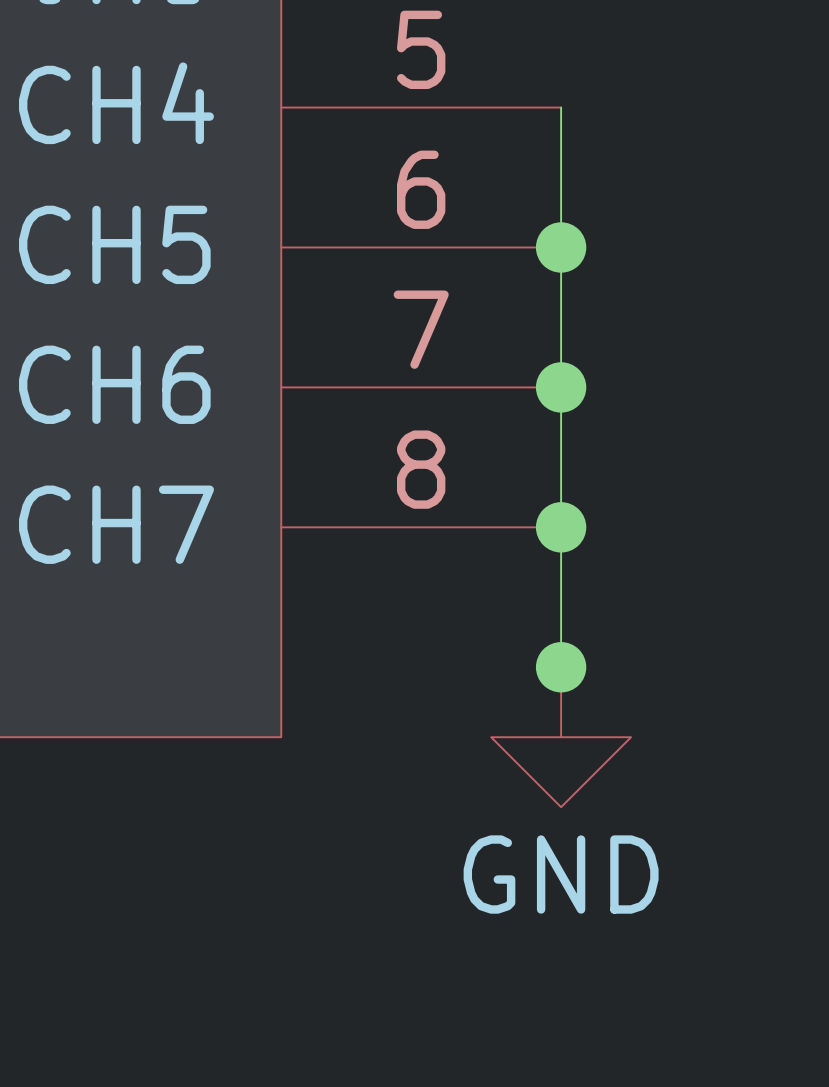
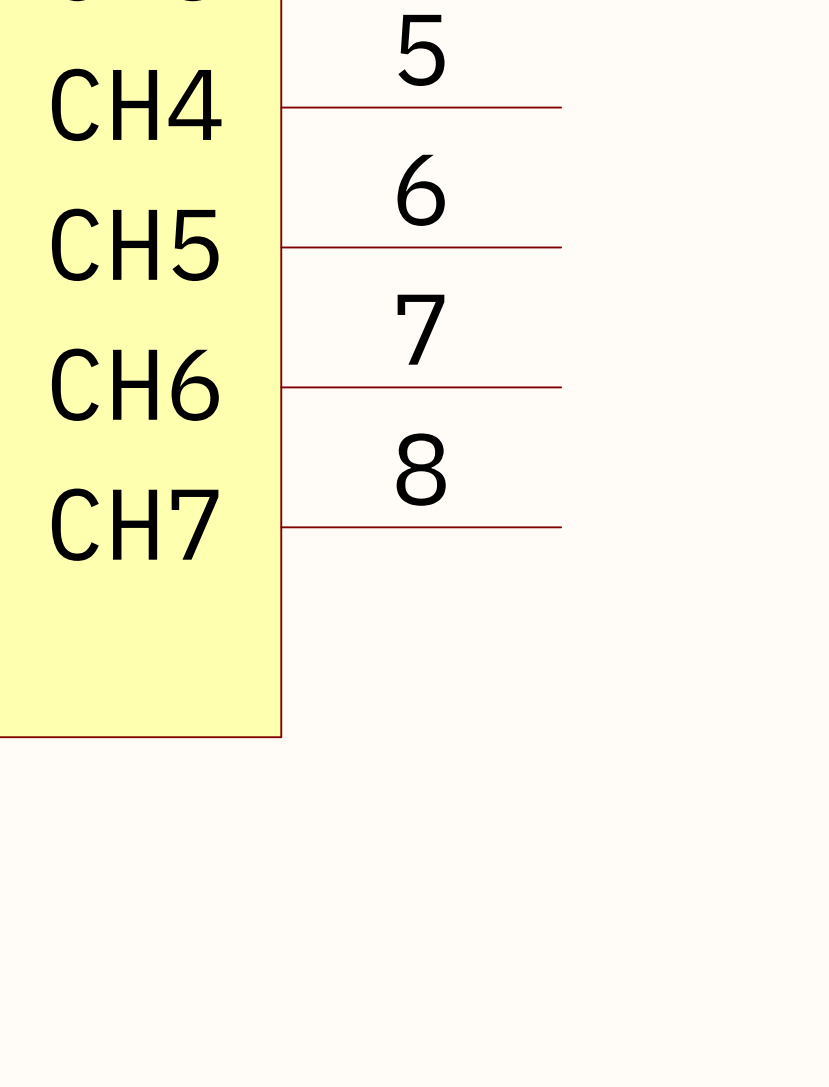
wire: (561, 107) (561, 667) -> none
junction: (561, 247) -> none
junction: (561, 387) -> none
junction: (561, 527) -> none
junction: (561, 667) -> none
power symbol: GND (561, 737) -> none

